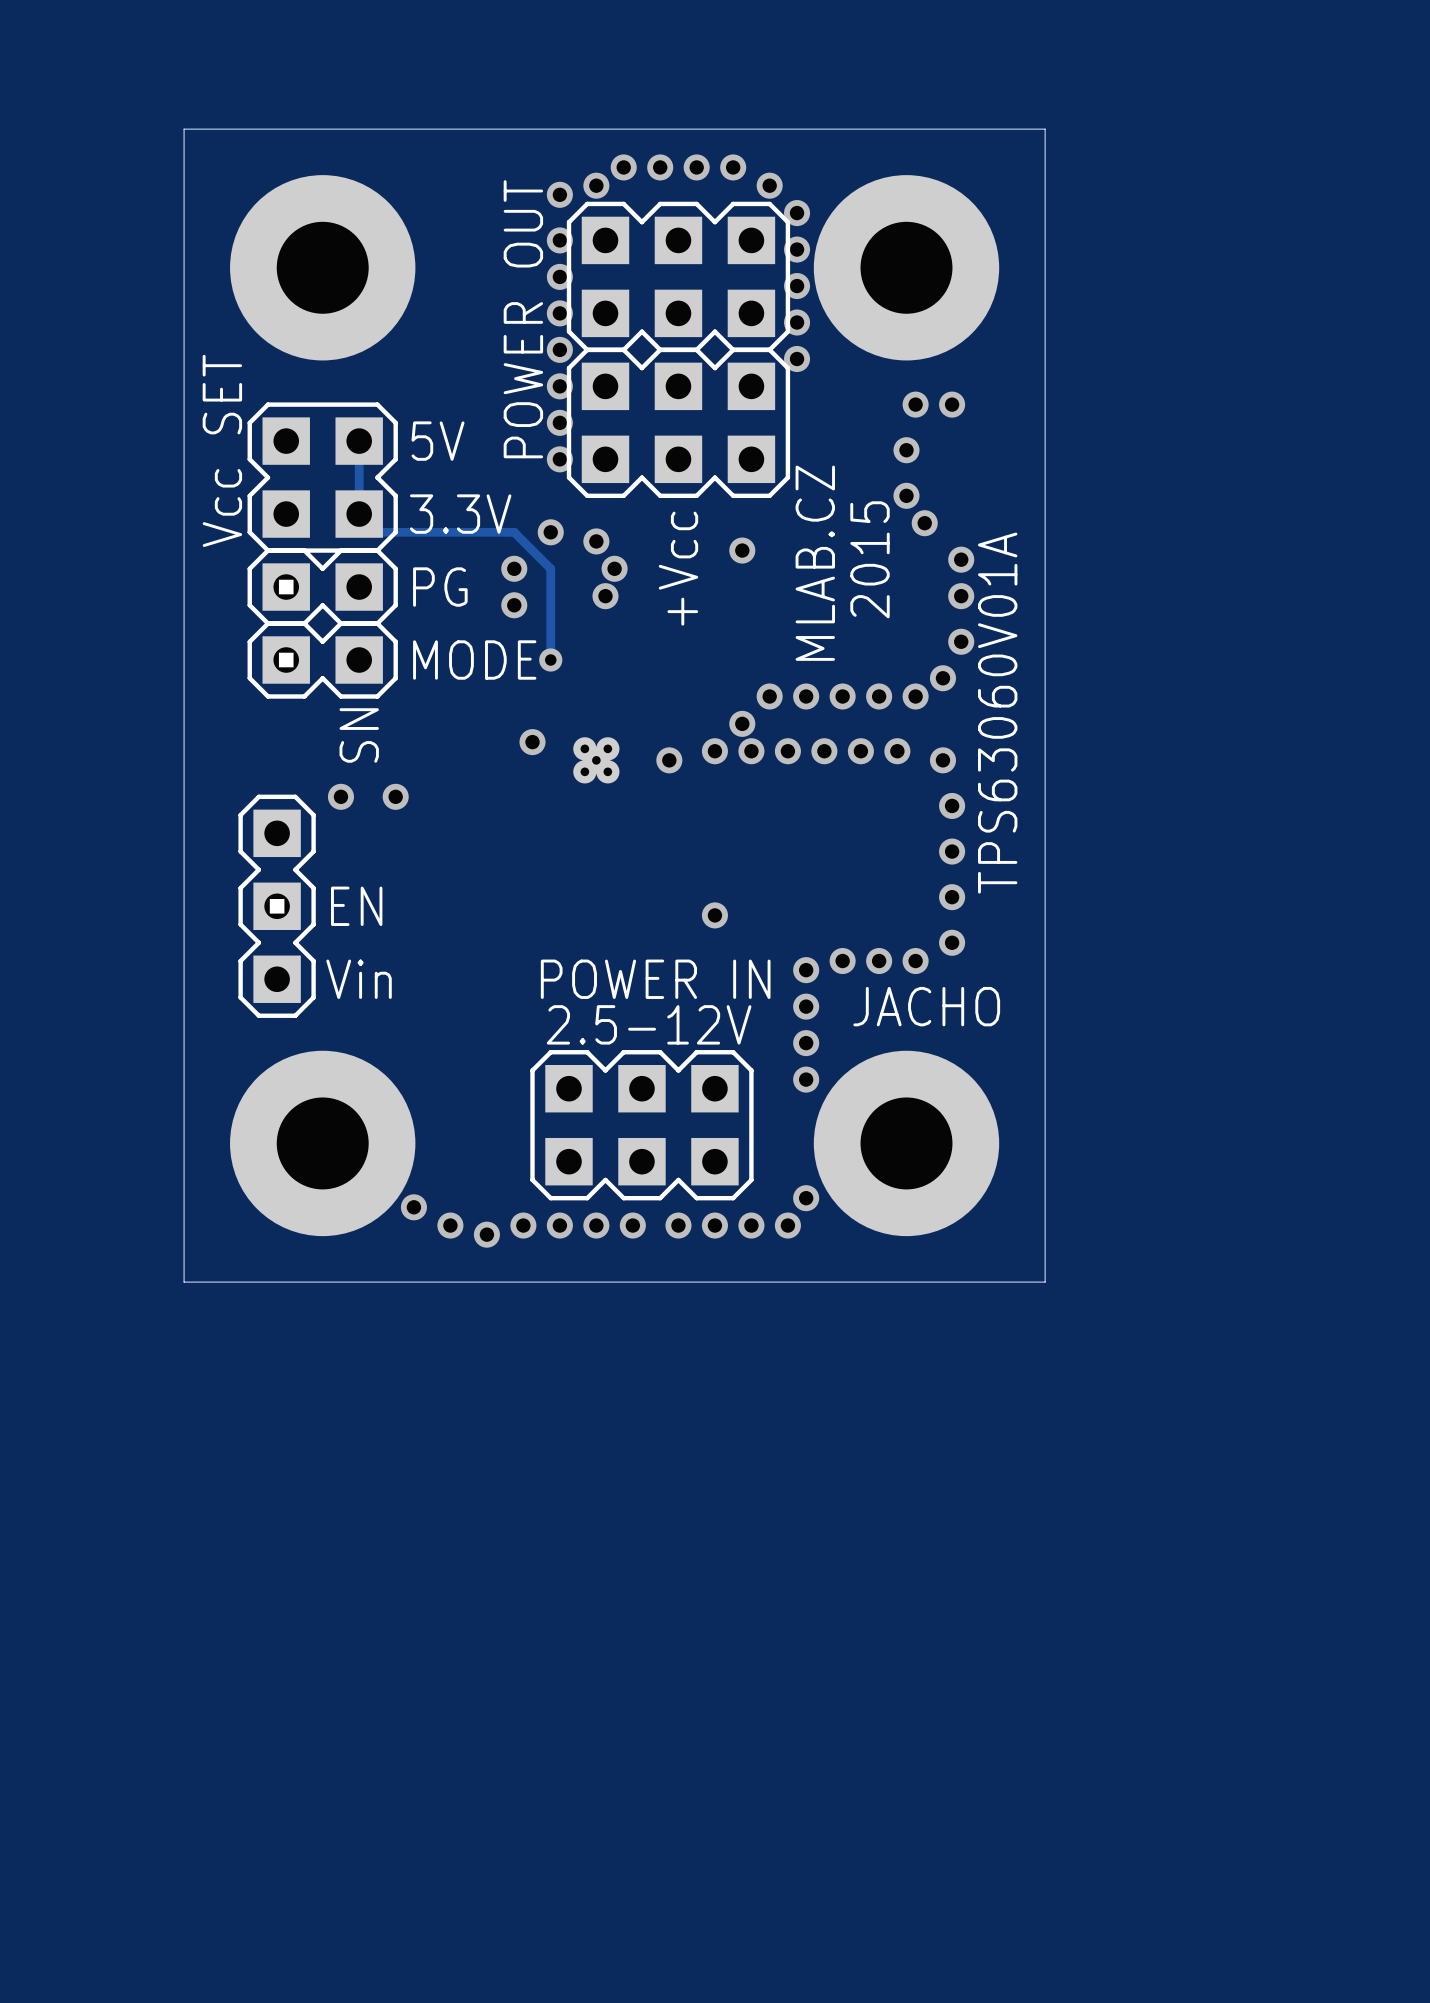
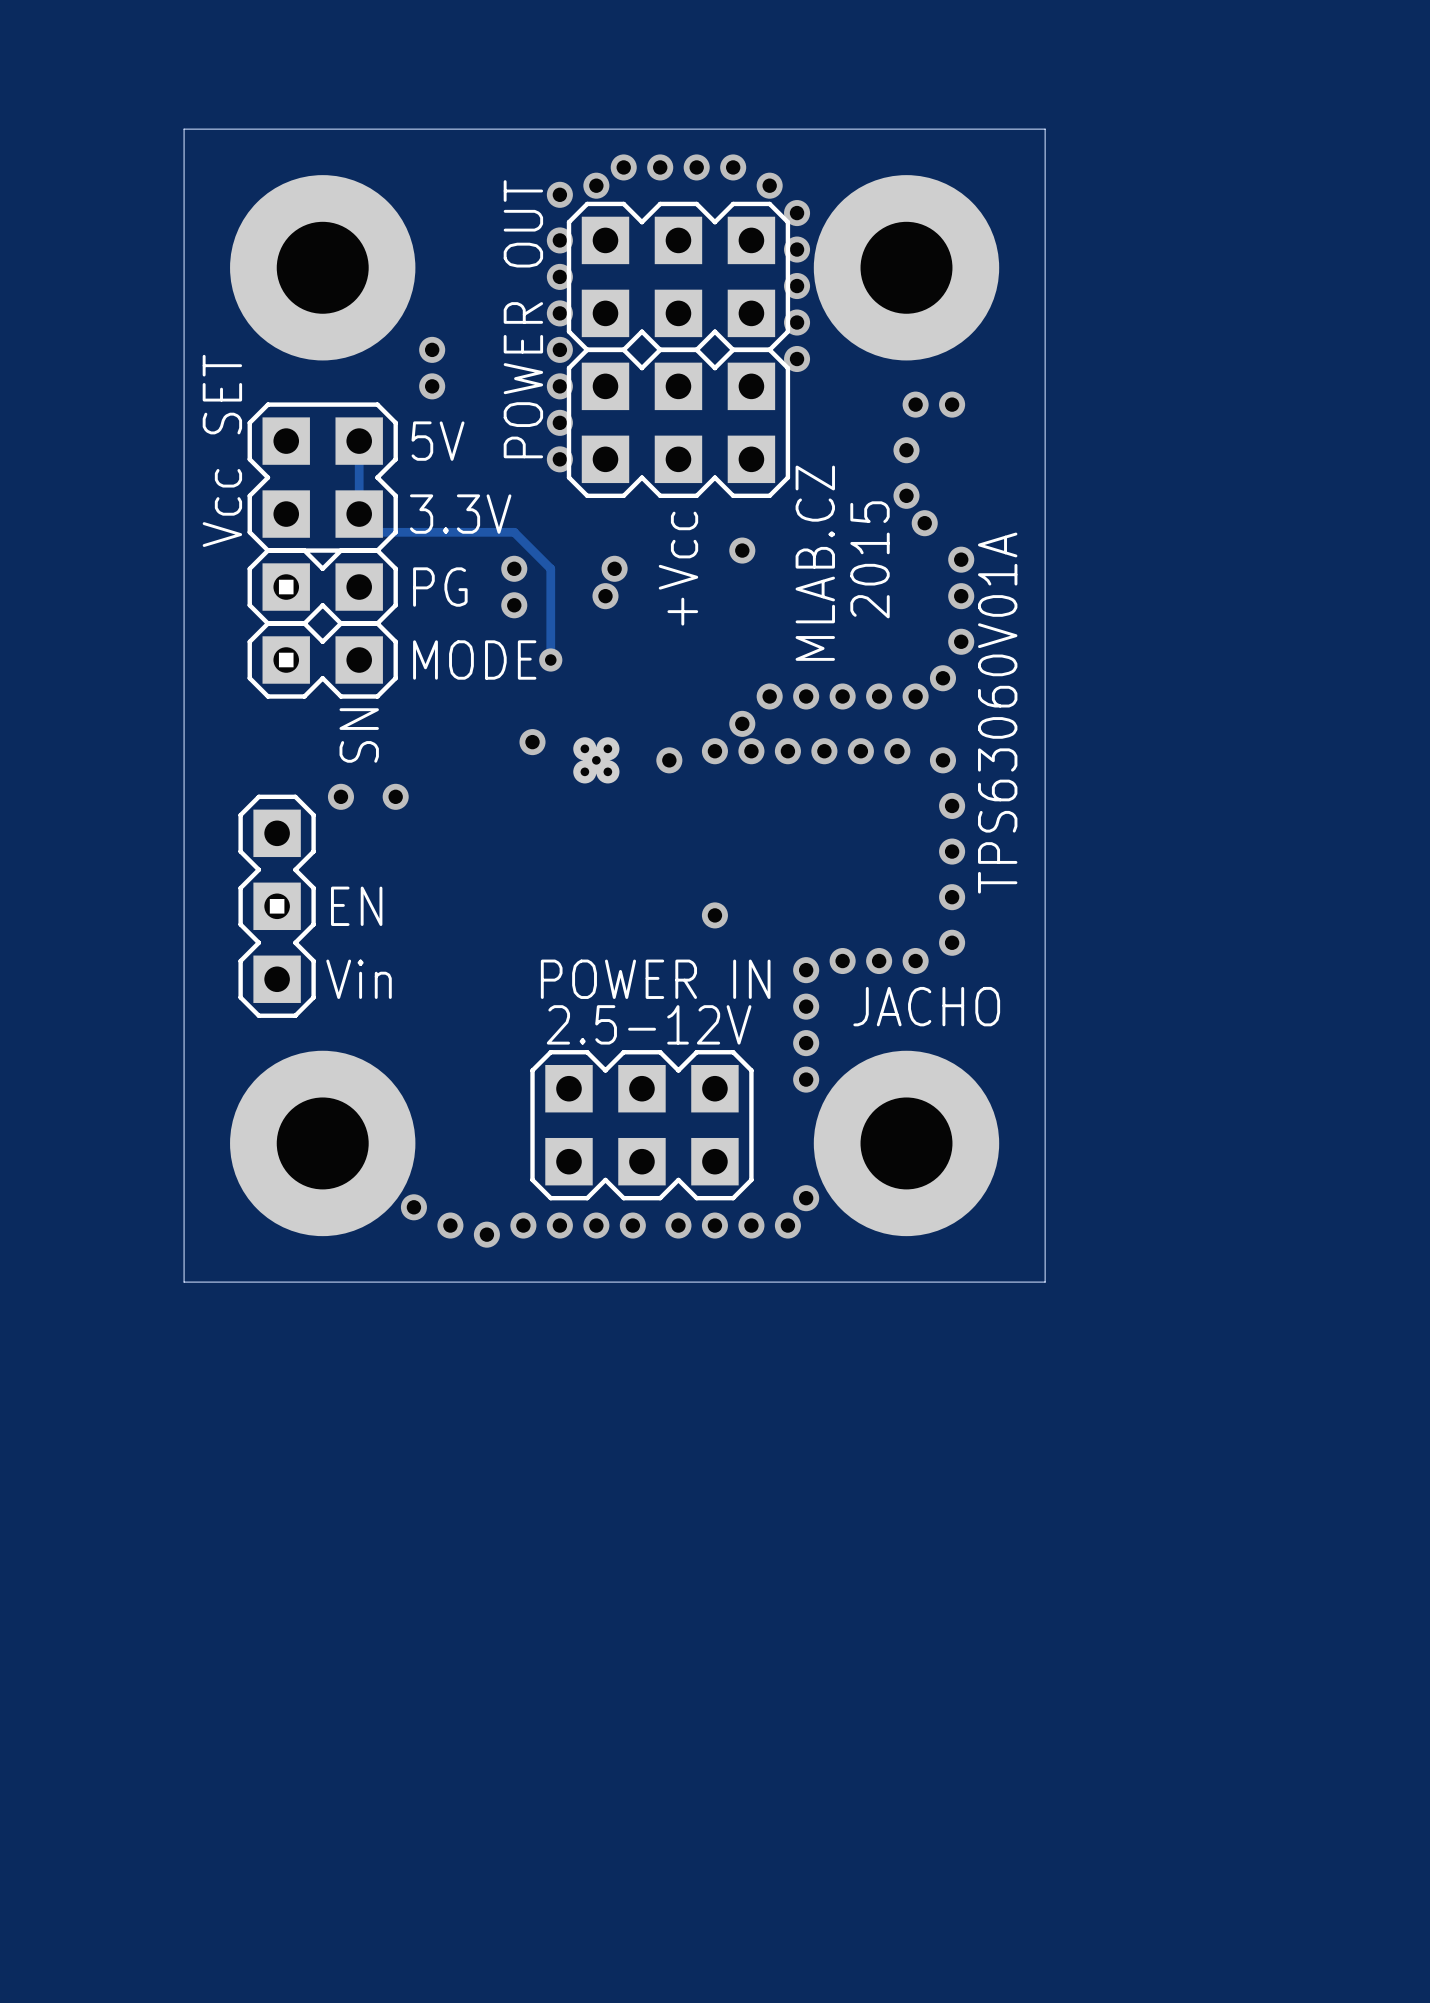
via: none -> (432, 349)
via: none -> (432, 386)
via: (550, 532) -> none
via: (596, 541) -> none

